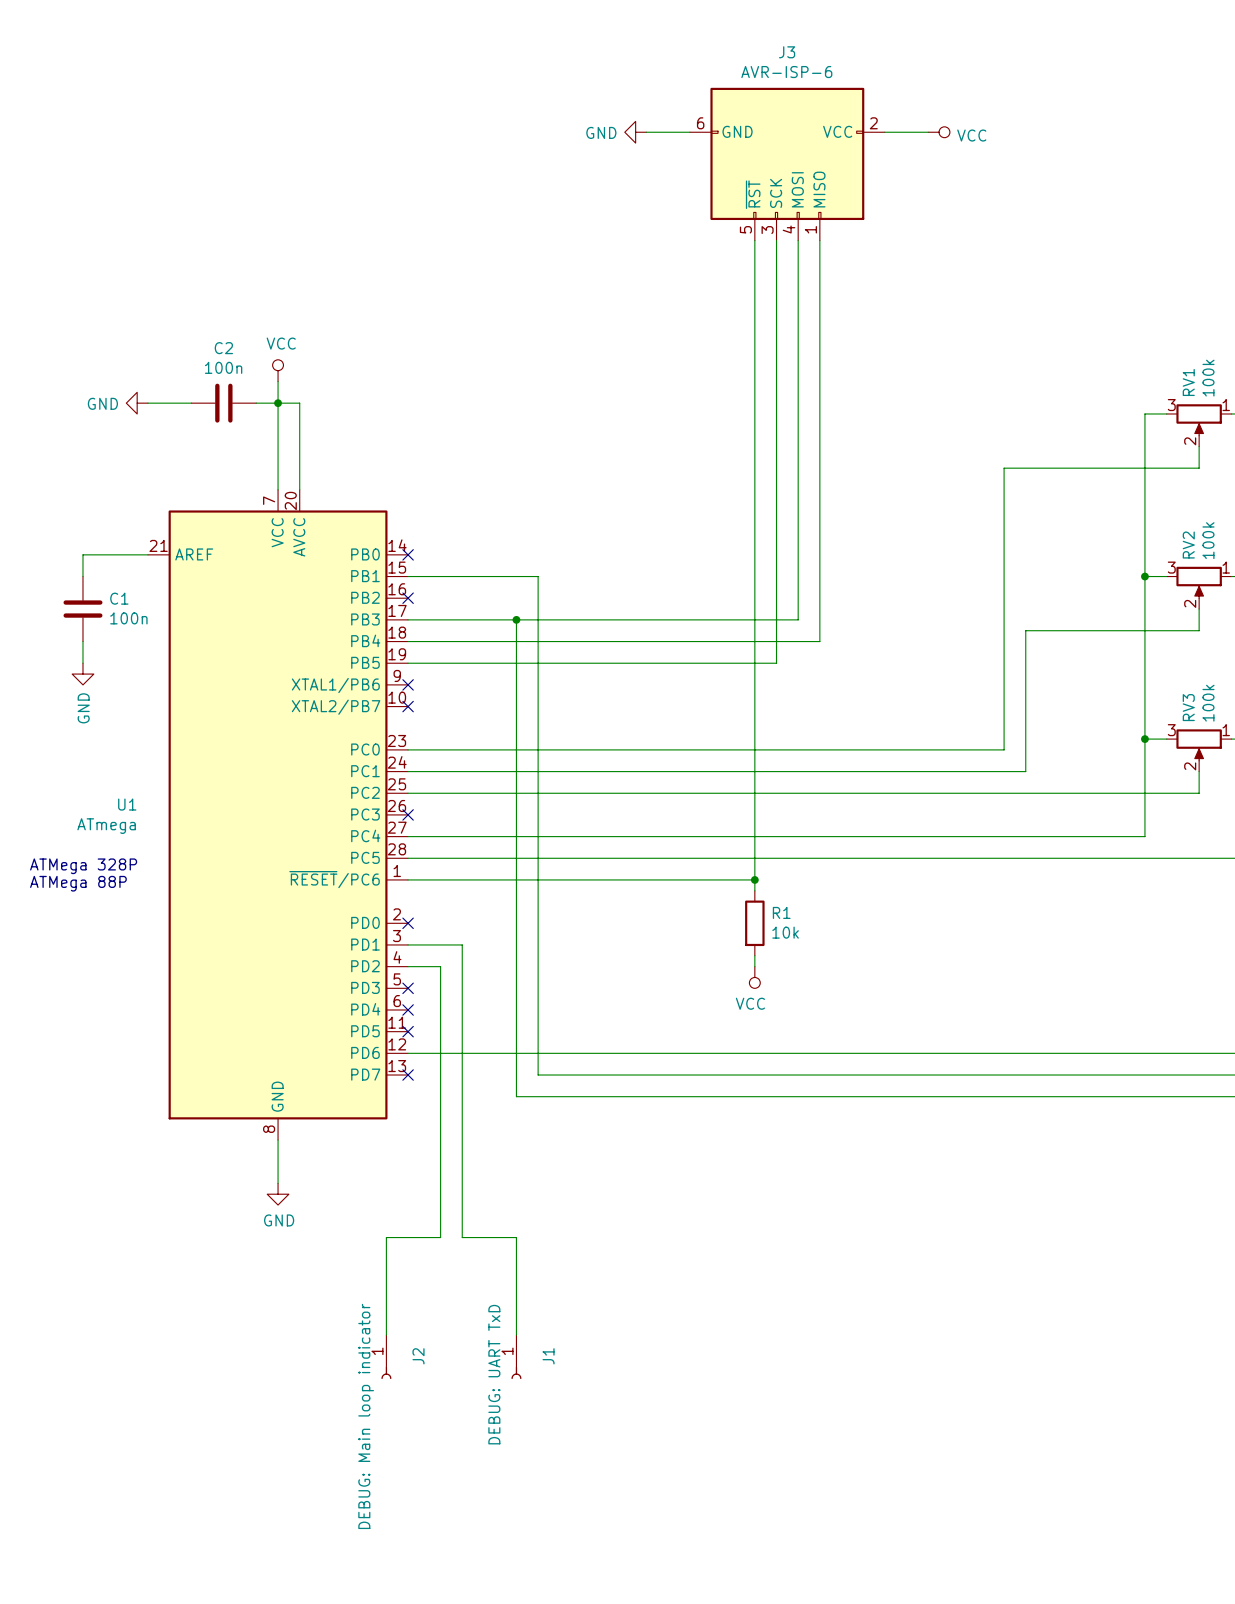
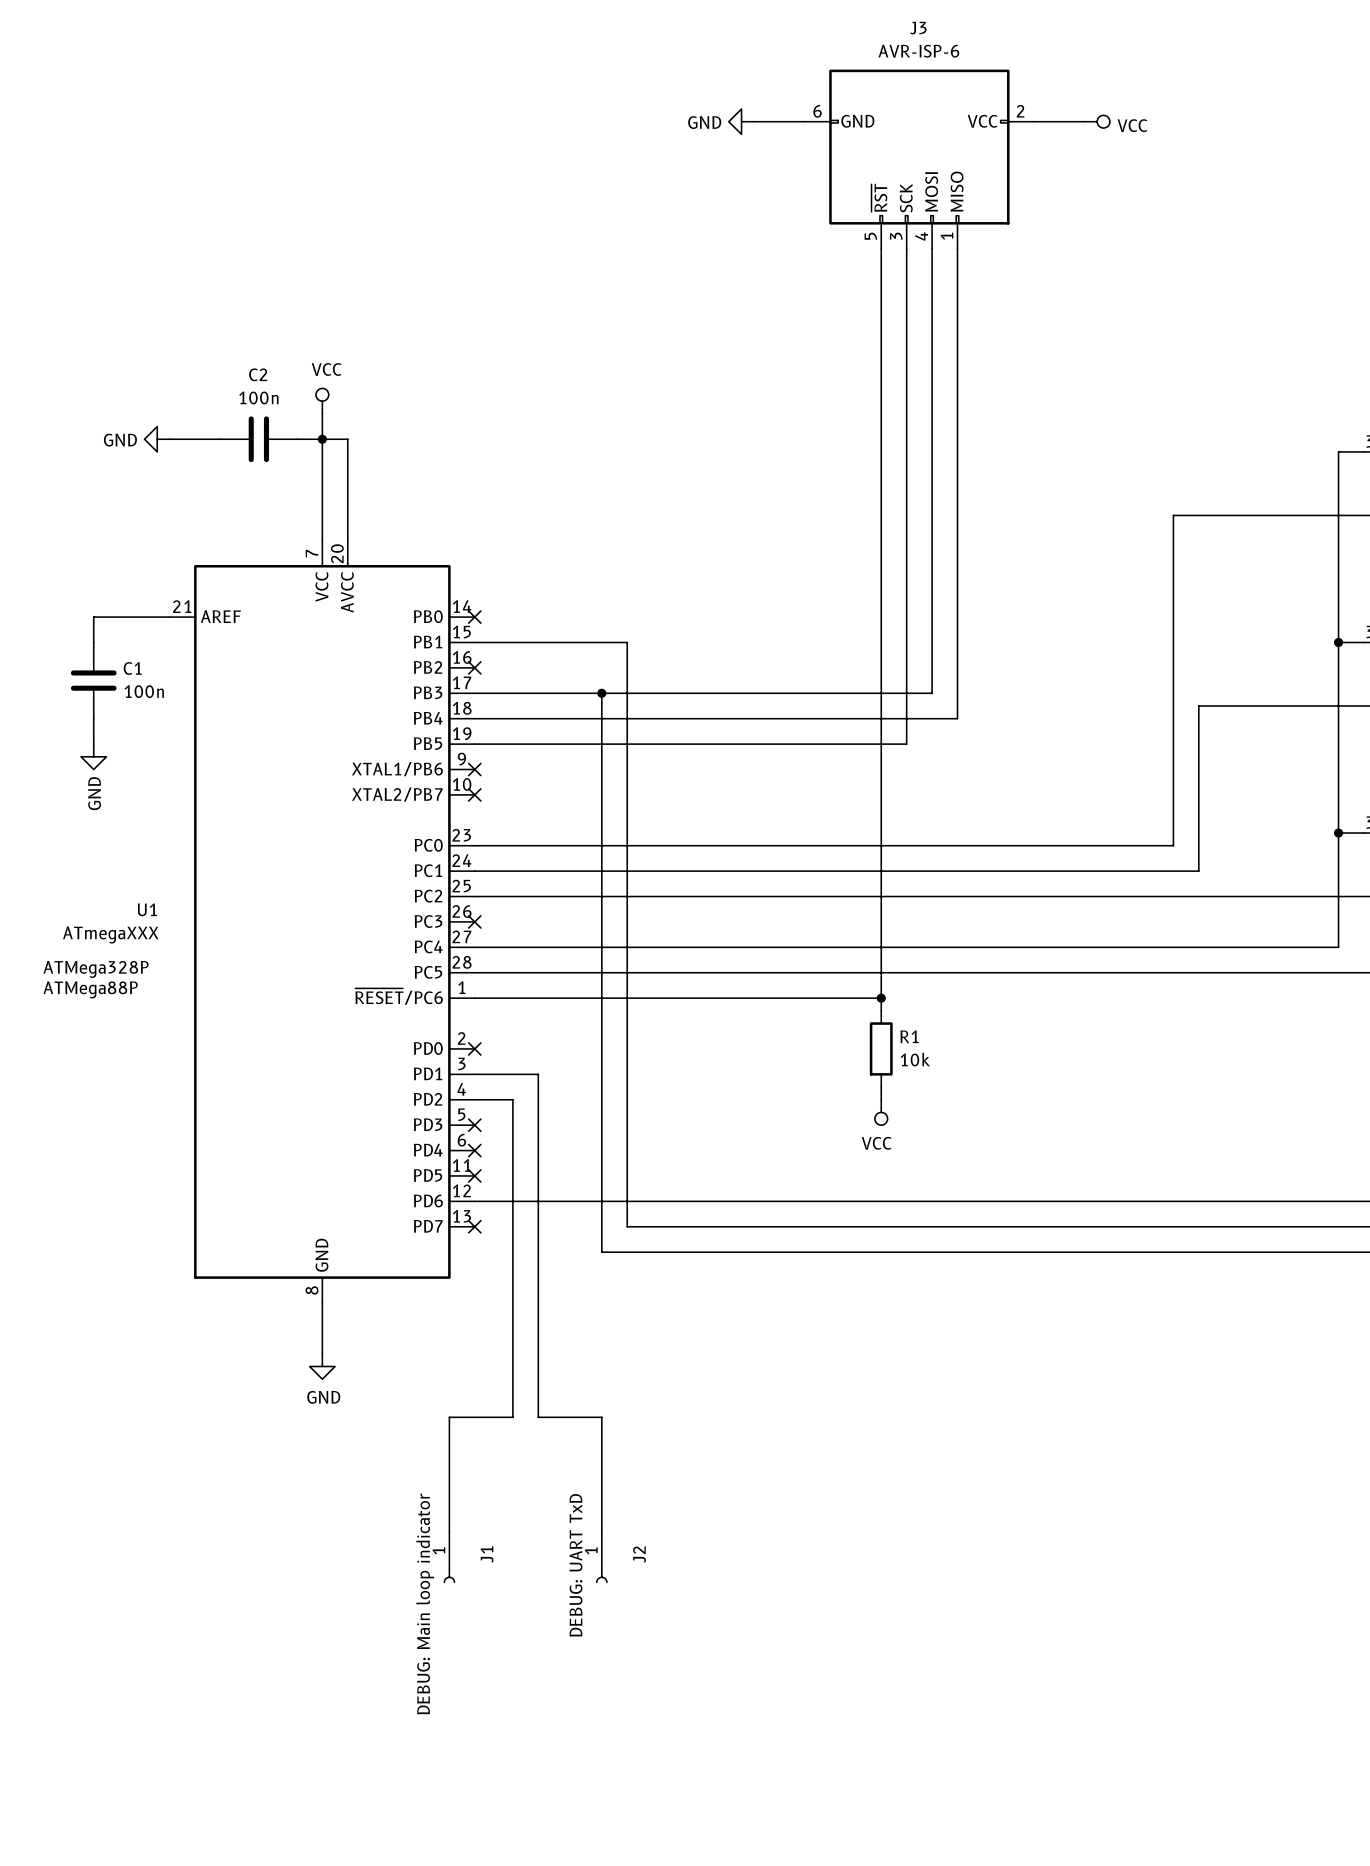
U1 value: ATmega (106, 826) -> ATmegaXXX (110, 935)
text: none -> ATMega328P (96, 969)
text: ATMega 328P (83, 866) -> none
text: none -> ATMega88P (90, 989)
text: ATMega 88P (78, 883) -> none
J2 name: J2 (418, 1356) -> J1 (487, 1554)
J1 name: J1 (548, 1356) -> J2 (639, 1554)

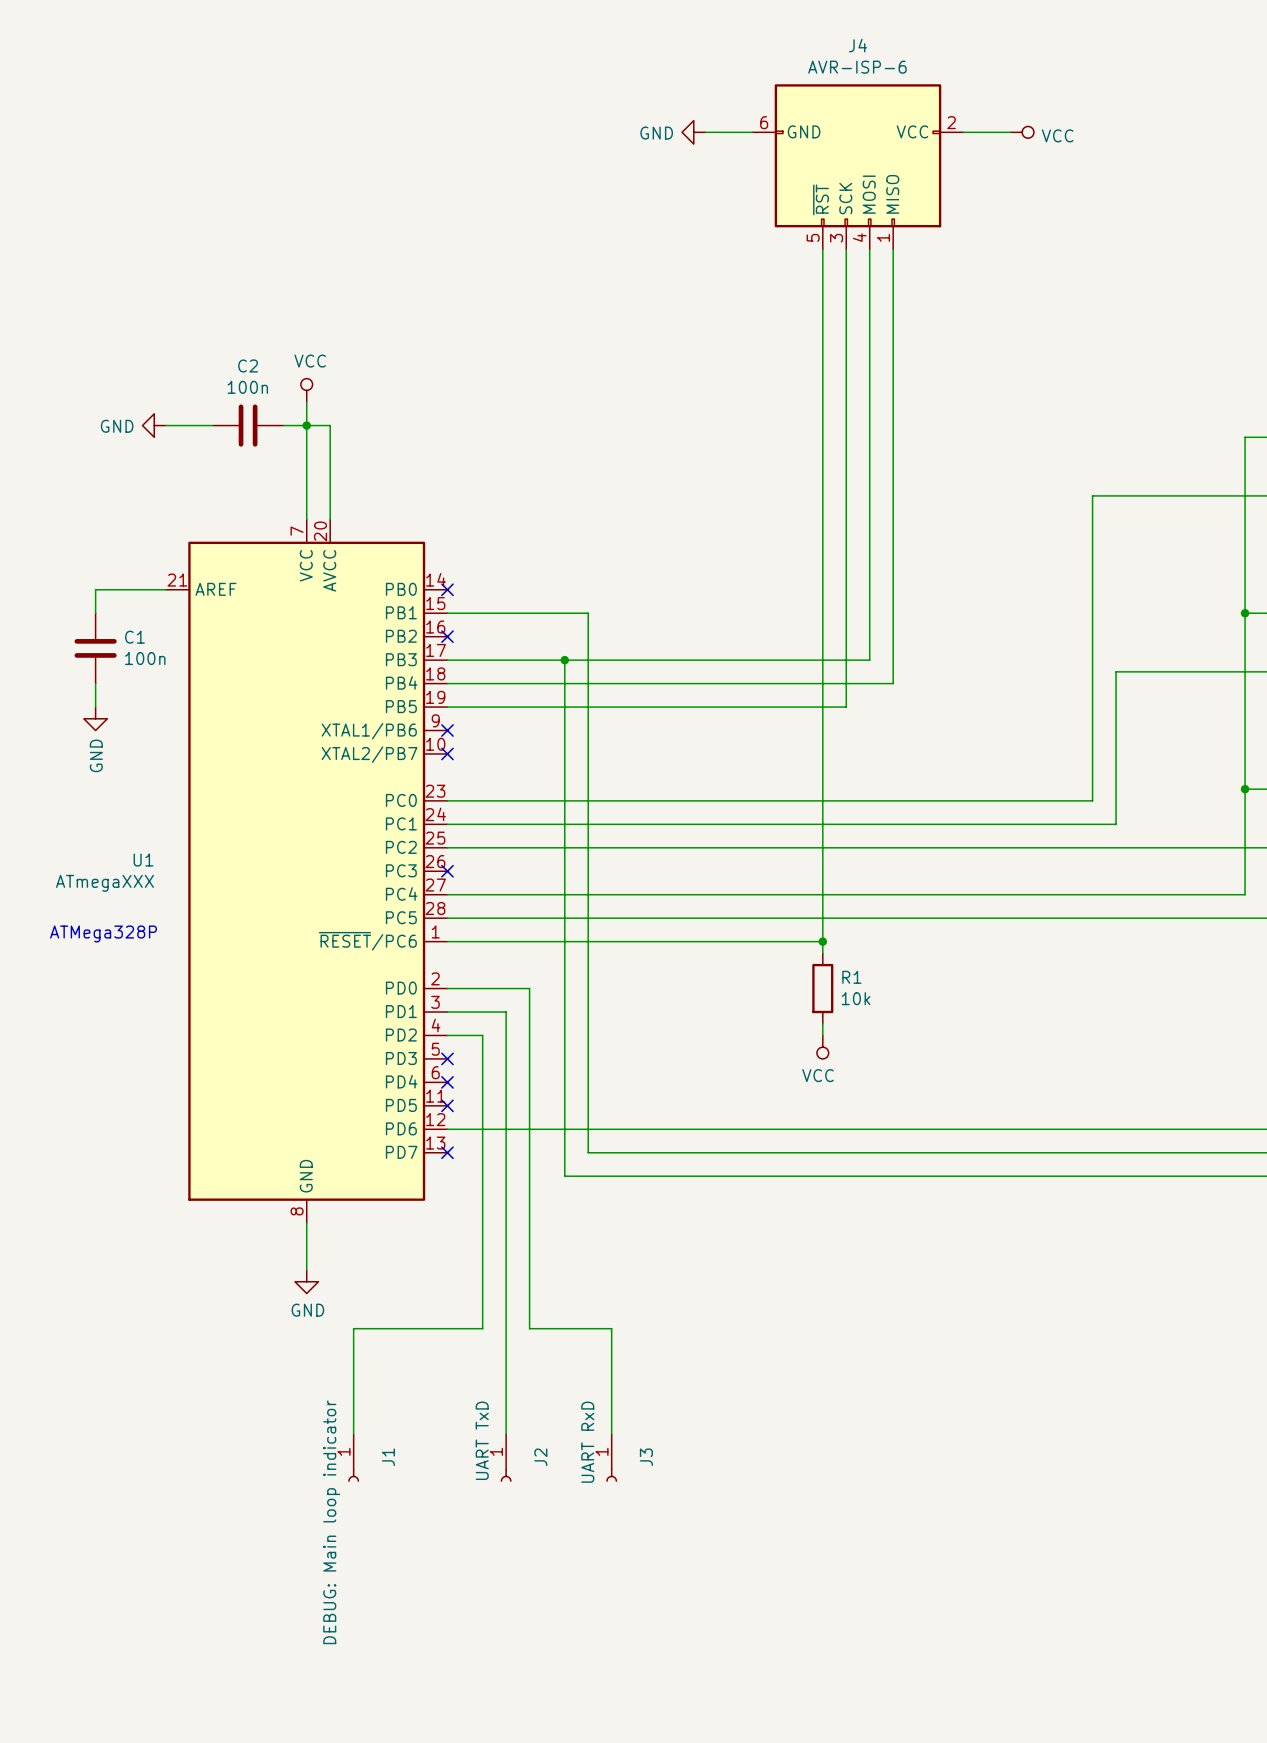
J3 name: J3 (918, 28) -> J4 (857, 45)
text: ATMega328P (96, 969) -> none
text: ATMega88P (90, 989) -> ATMega328P (103, 933)
wire: none -> (447, 988) (529, 988) (529, 1328)
no-connect mark: (474, 1048) -> none
wire: (449, 1417) (449, 1531) -> (424, 1328) (353, 1328) (353, 1434)
wire: (538, 1417) (563, 1417) -> (506, 1328) (506, 1434)
wire: (601, 1417) (601, 1531) -> (564, 1328) (611, 1328) (611, 1434)
J1 position: (449, 1557) -> (353, 1458)
J2 position: (601, 1557) -> (506, 1458)
J3: none -> UART RxD (611, 1458)
J2 value: DEBUG: UART TxD (576, 1565) -> UART TxD (482, 1440)

